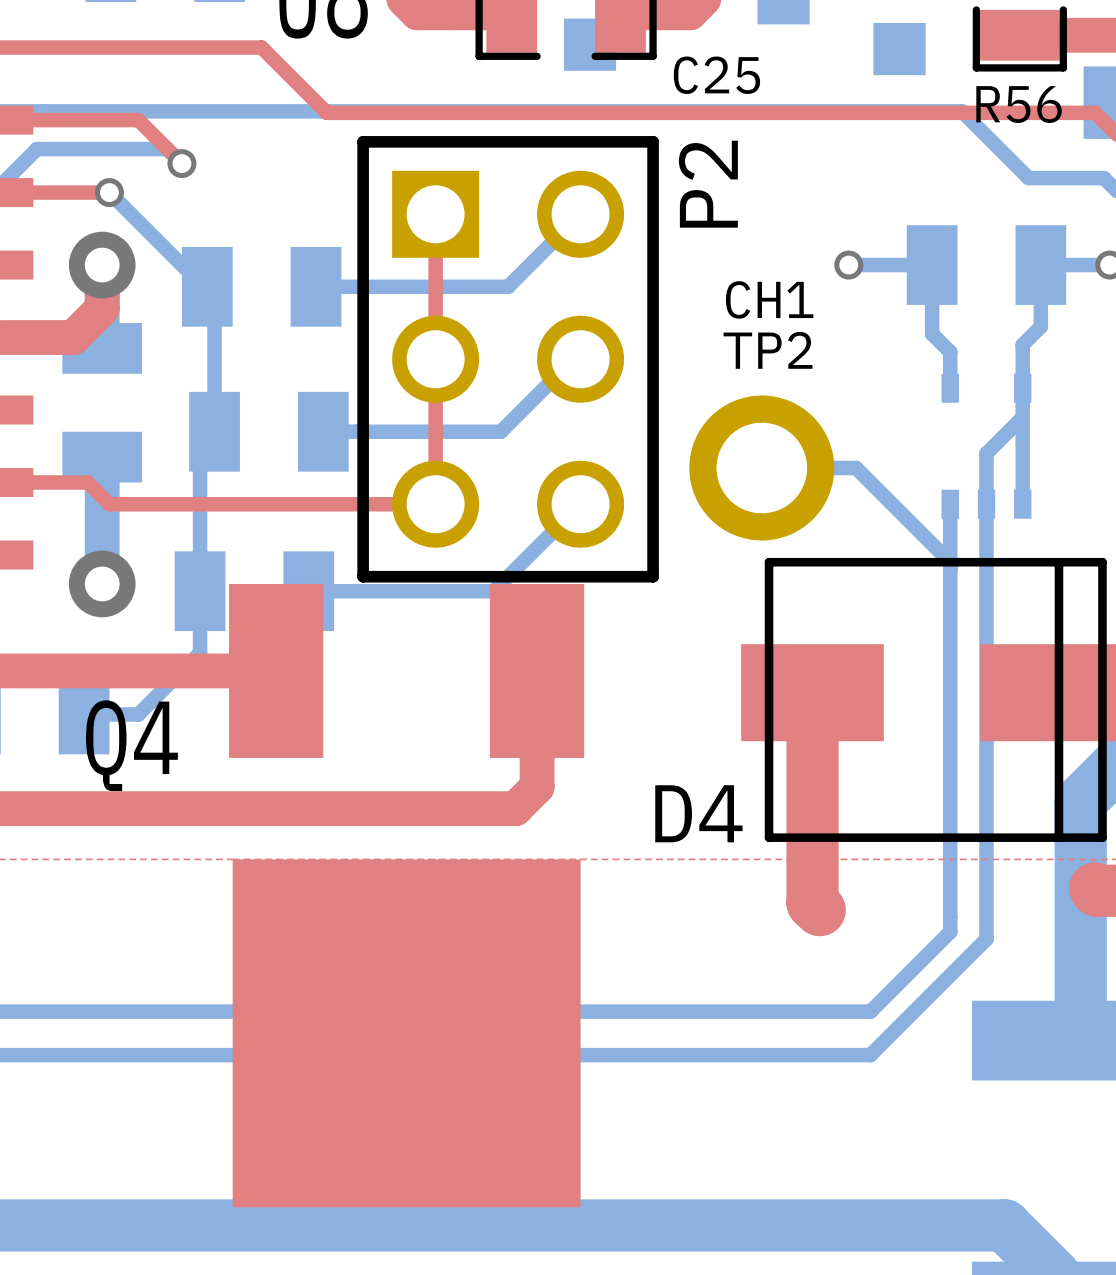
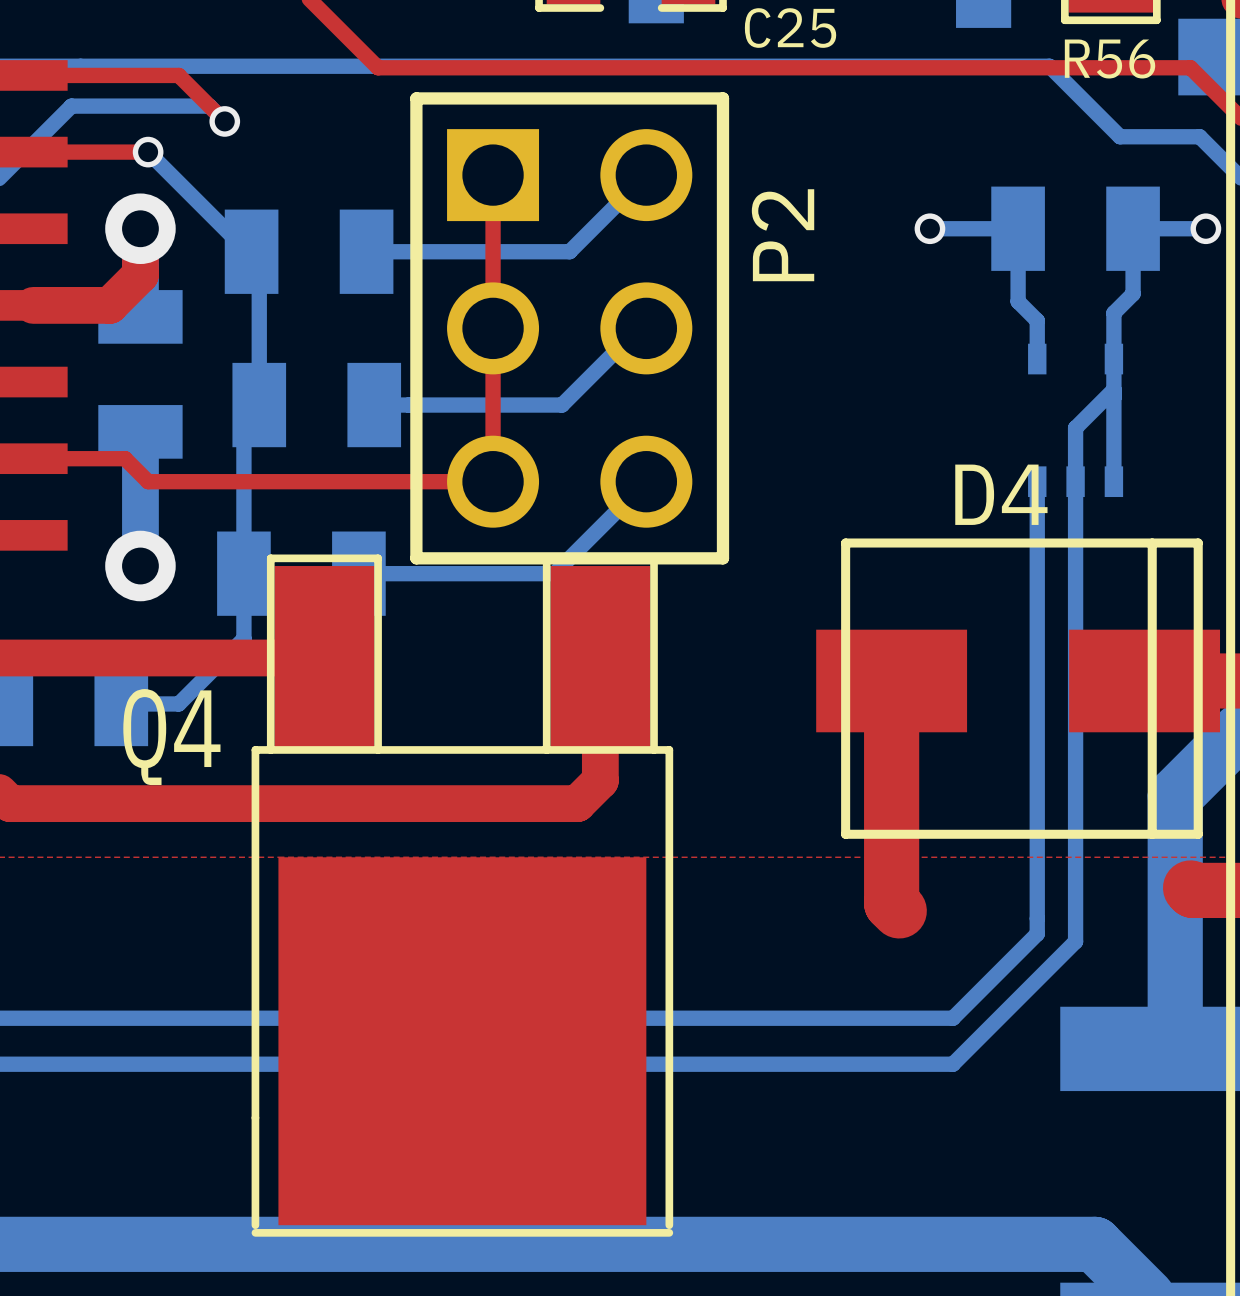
P2 name position: P2 (708, 184) -> P2 (783, 235)
bottom track: (761, 468) (856, 468) (950, 562) -> none
TP2: CH1 (761, 468) -> none
Q4 footprint: [229, 583, 585, 1208] -> [251, 554, 674, 1237]
D4 name position: D4 (698, 813) -> D4 (1001, 494)

